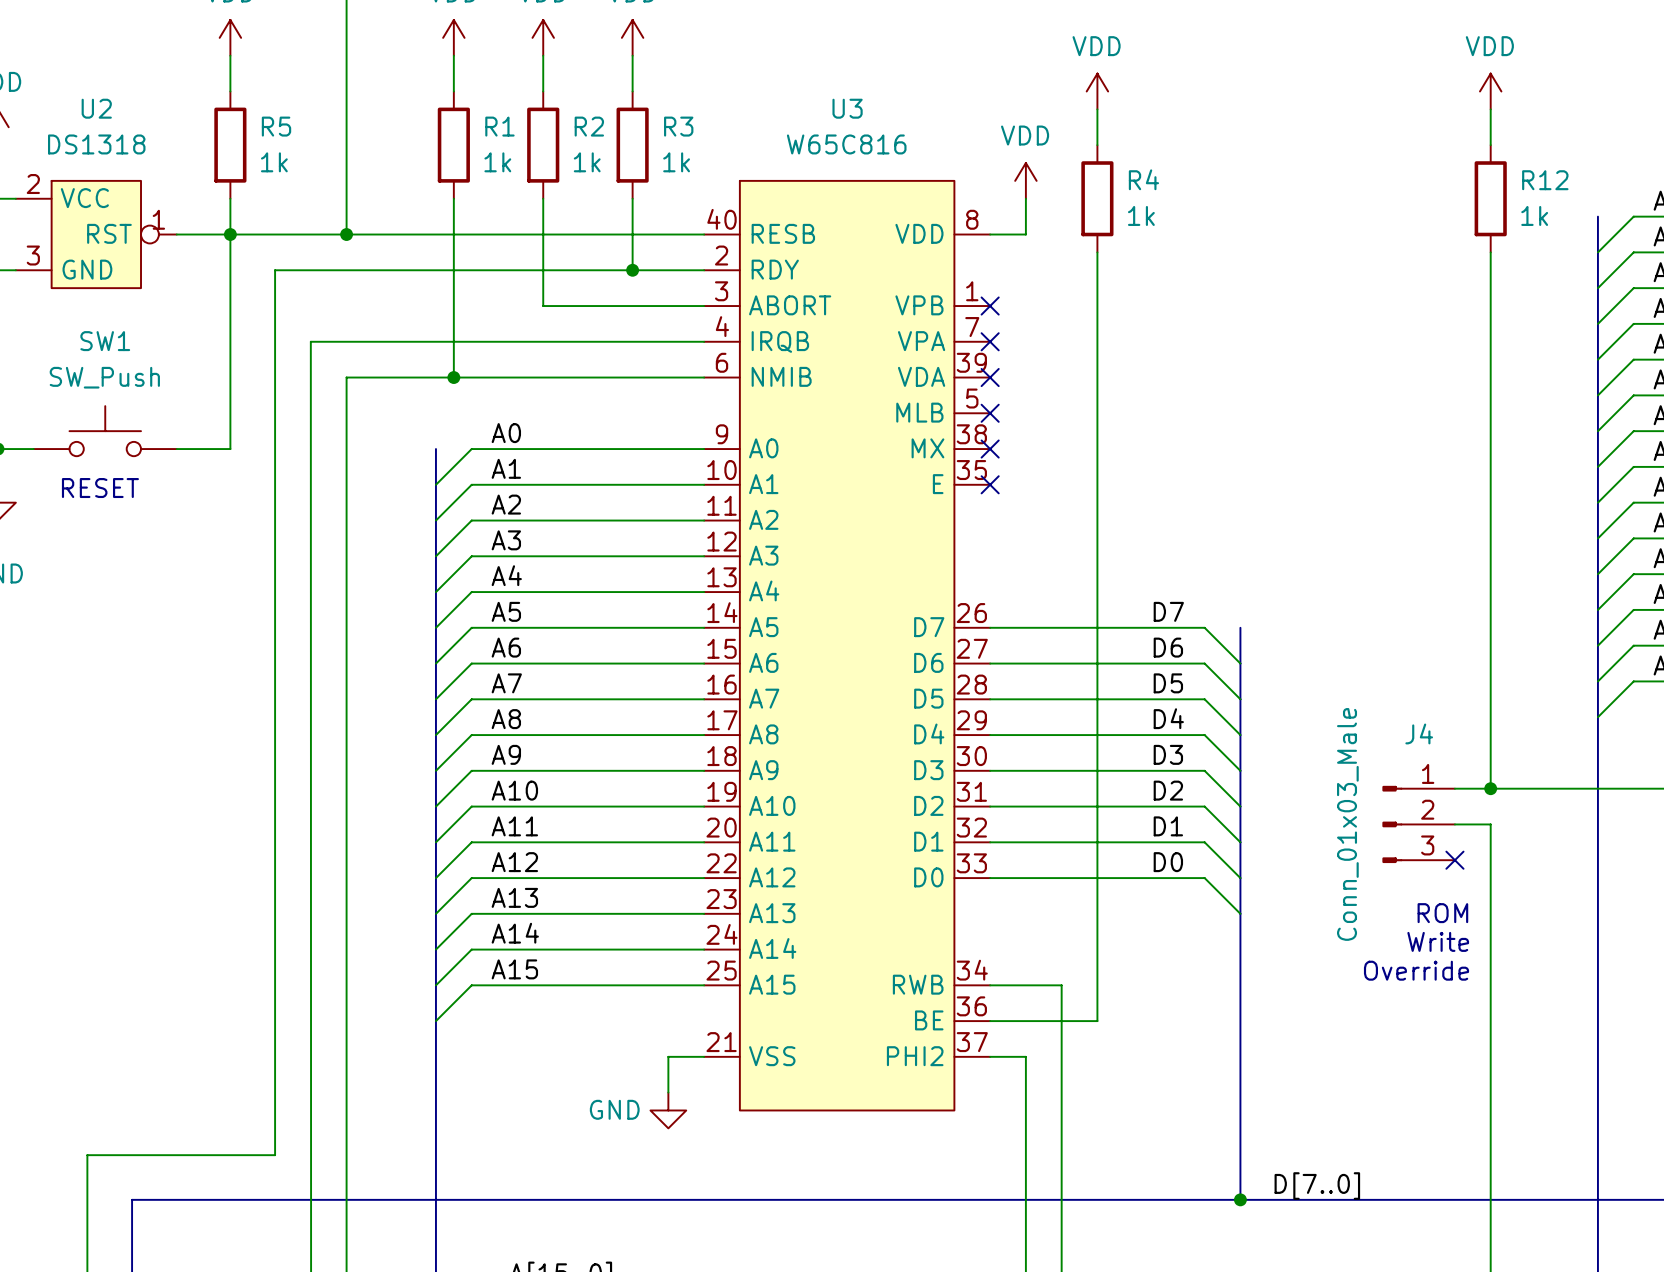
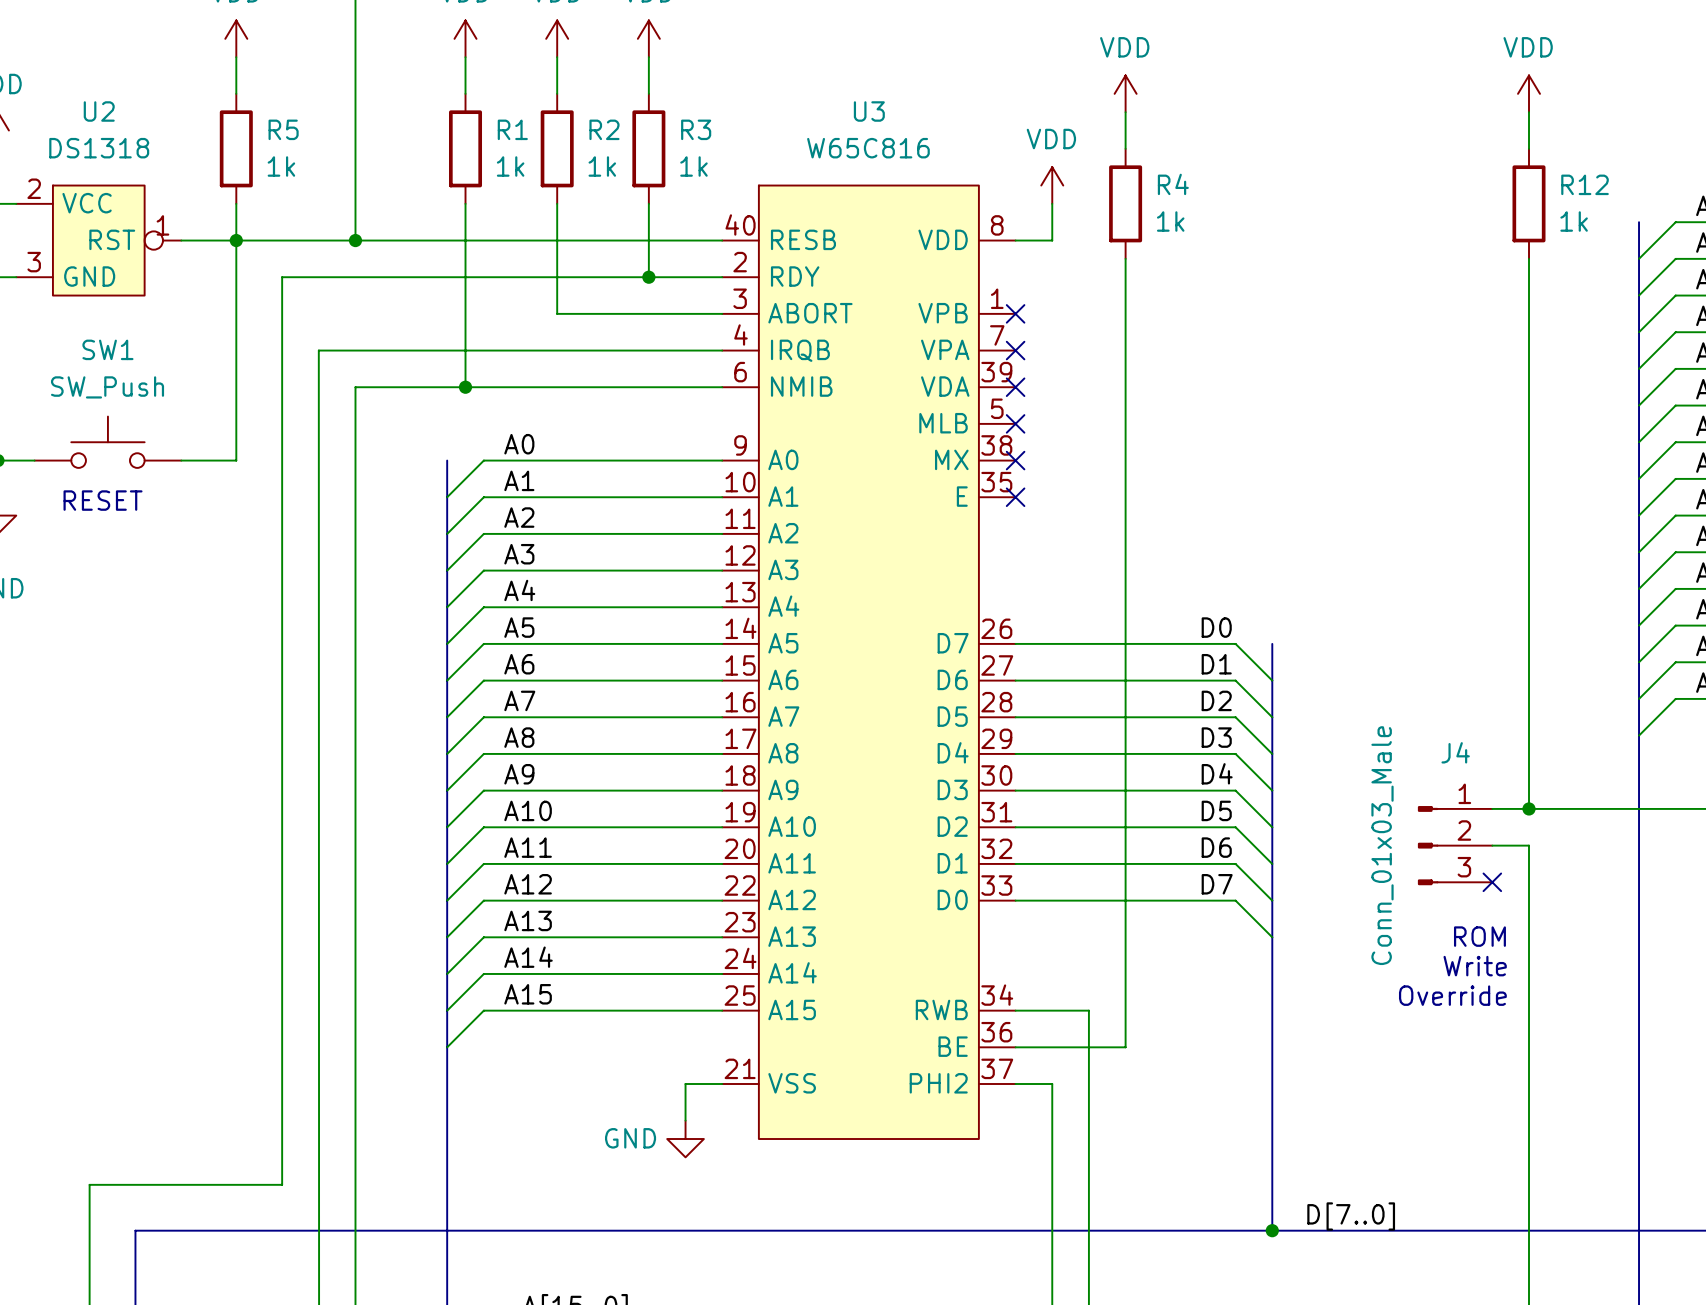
label position: D7 (1168, 611) -> D7 (1217, 884)
label position: D6 (1168, 647) -> D6 (1216, 847)
label position: D5 (1168, 683) -> D5 (1216, 810)
label position: D4 (1168, 718) -> D4 (1217, 773)
label position: D3 (1168, 754) -> D3 (1216, 737)
label position: D2 (1168, 790) -> D2 (1216, 700)
label position: D1 (1168, 826) -> D1 (1216, 664)
label position: D0 (1168, 862) -> D0 (1216, 627)

